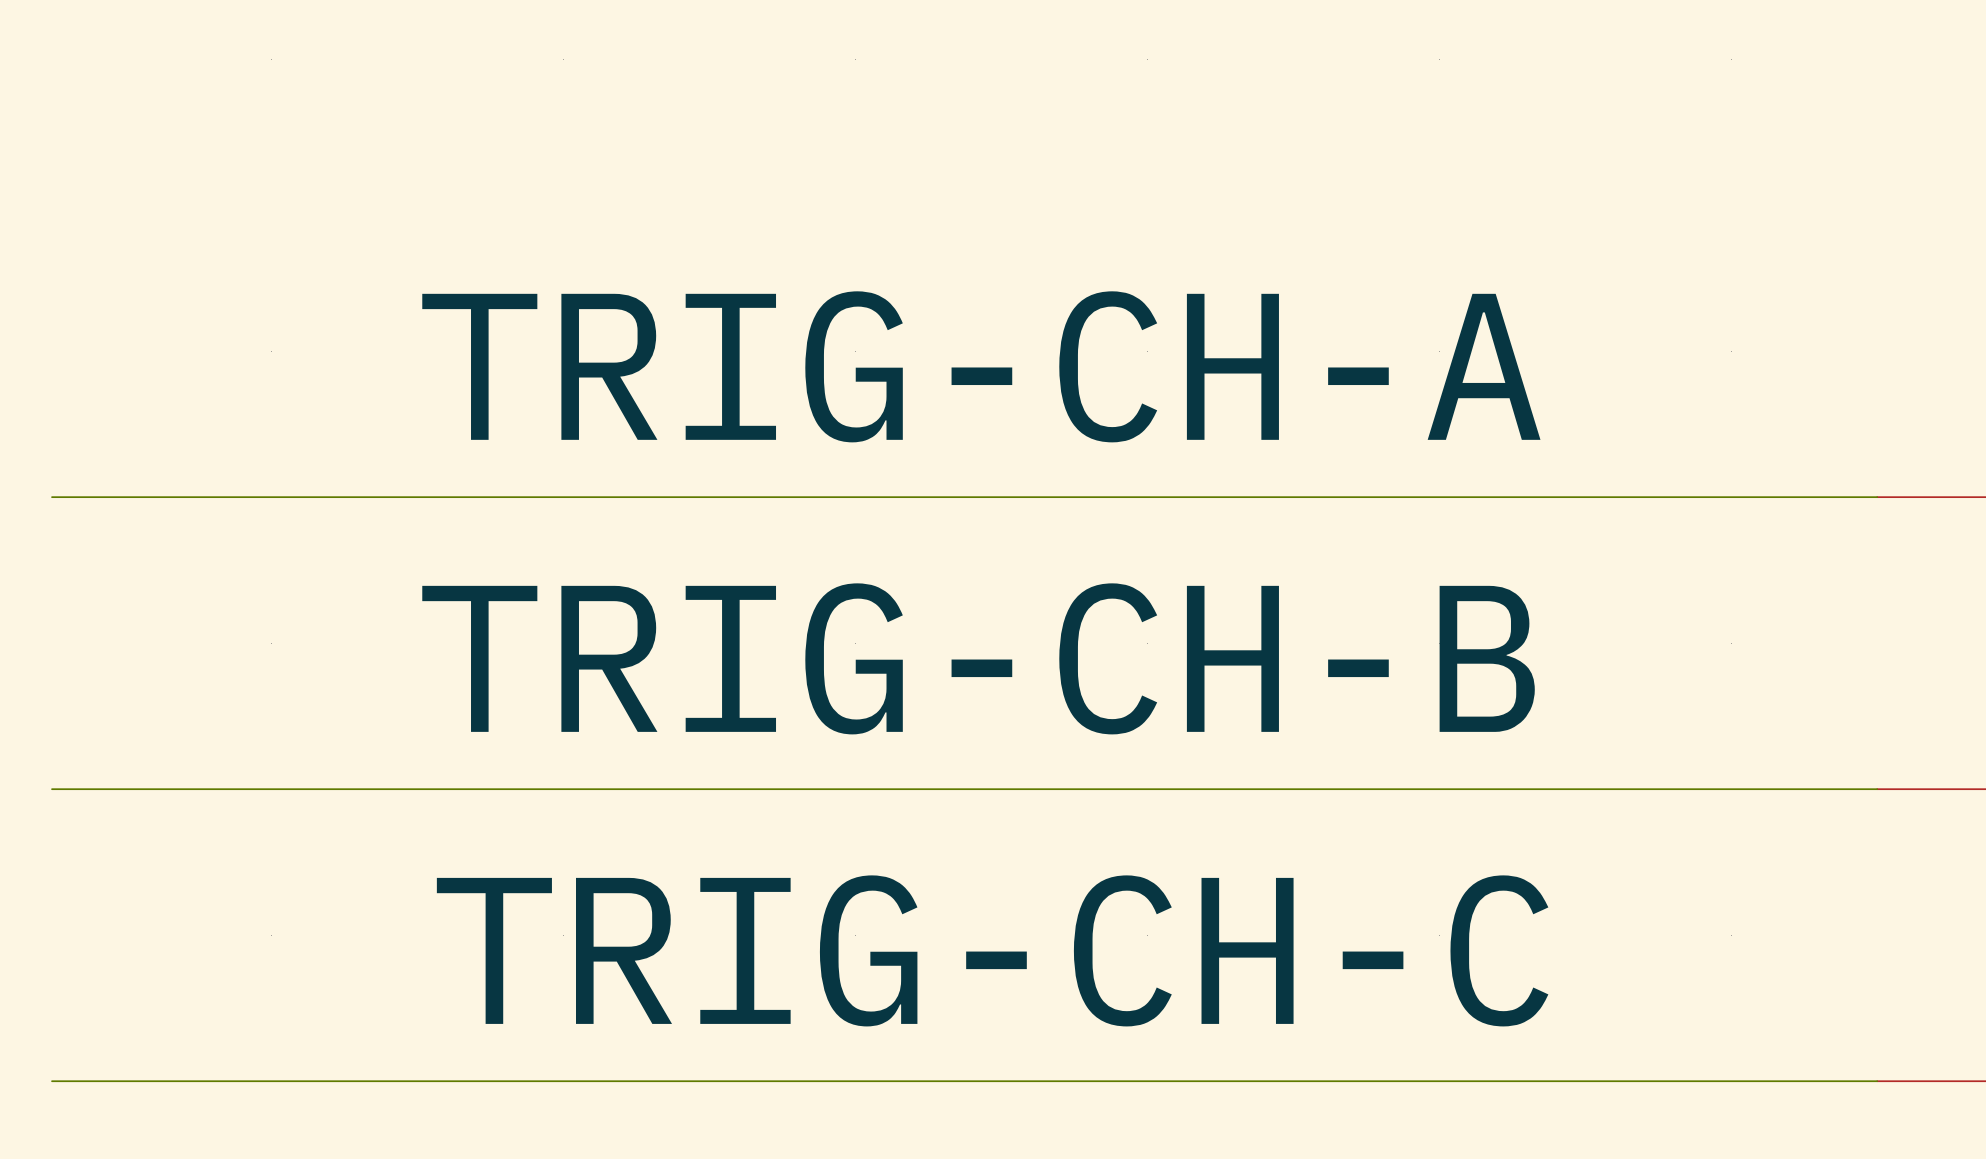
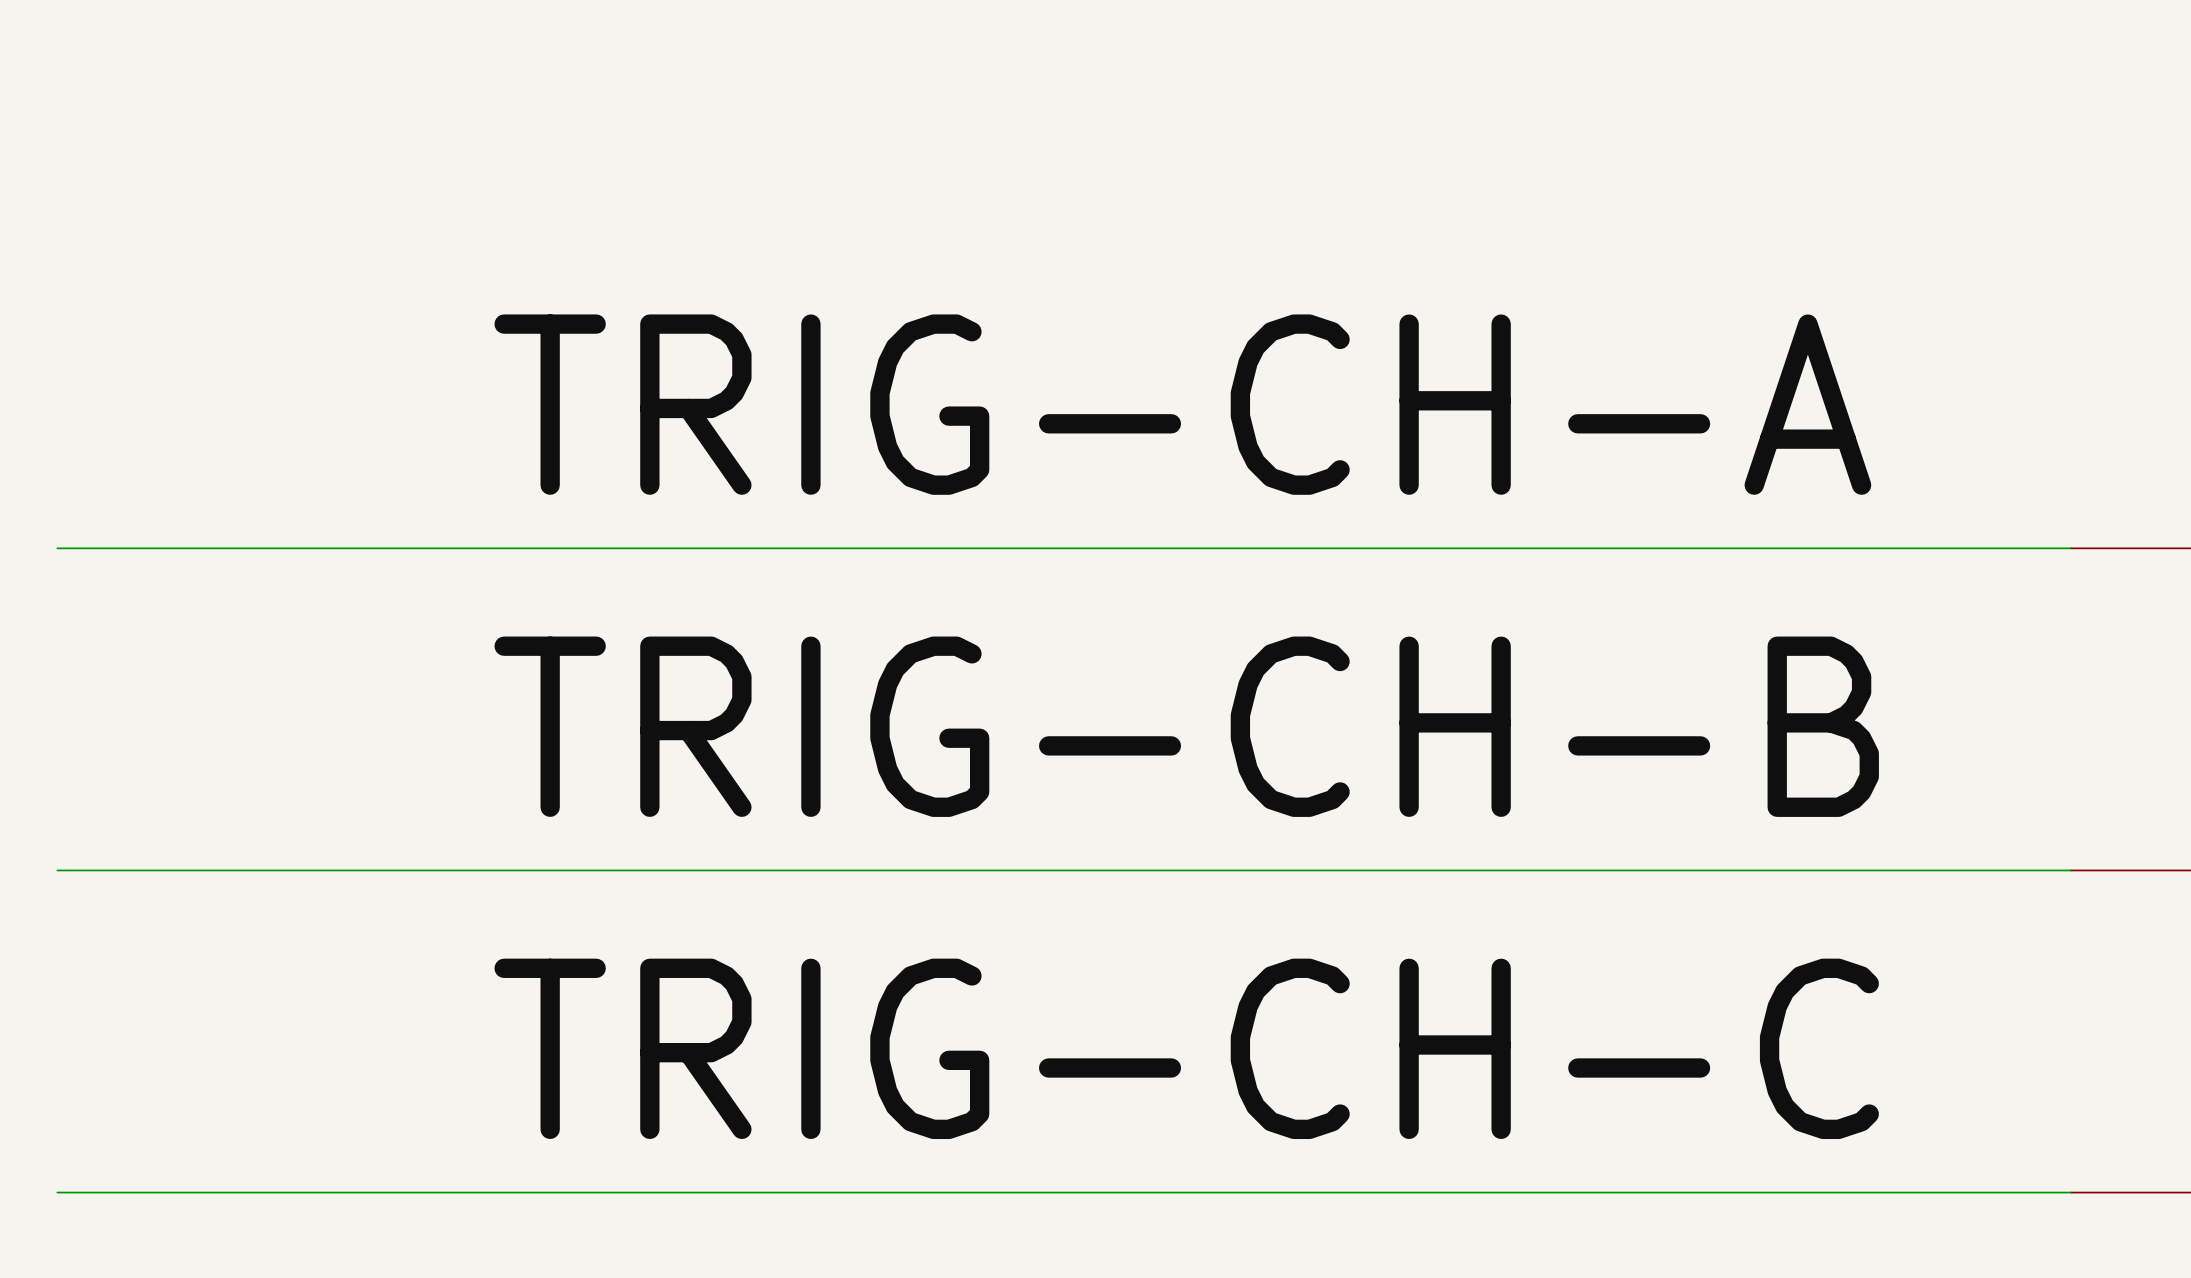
label position: TRIG-CH-A (981, 366) -> TRIG-CH-A (1182, 404)
label position: TRIG-CH-B (978, 658) -> TRIG-CH-B (1186, 726)

